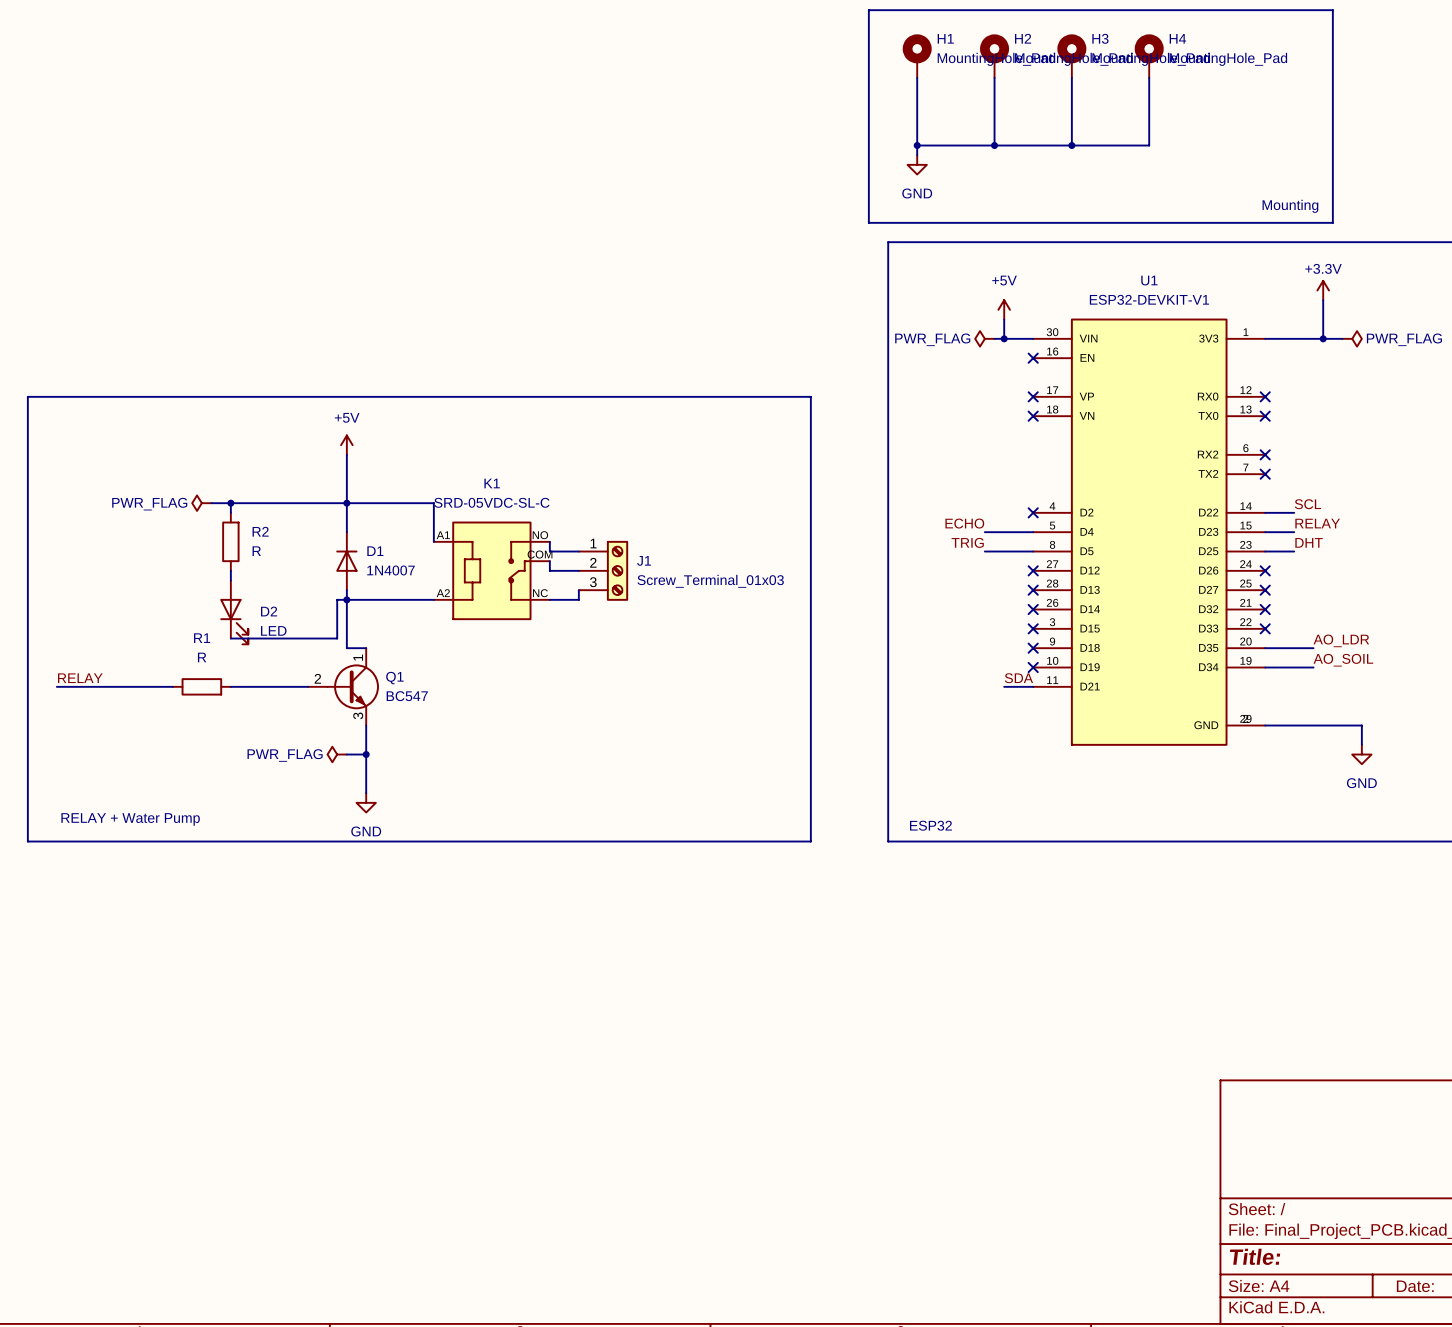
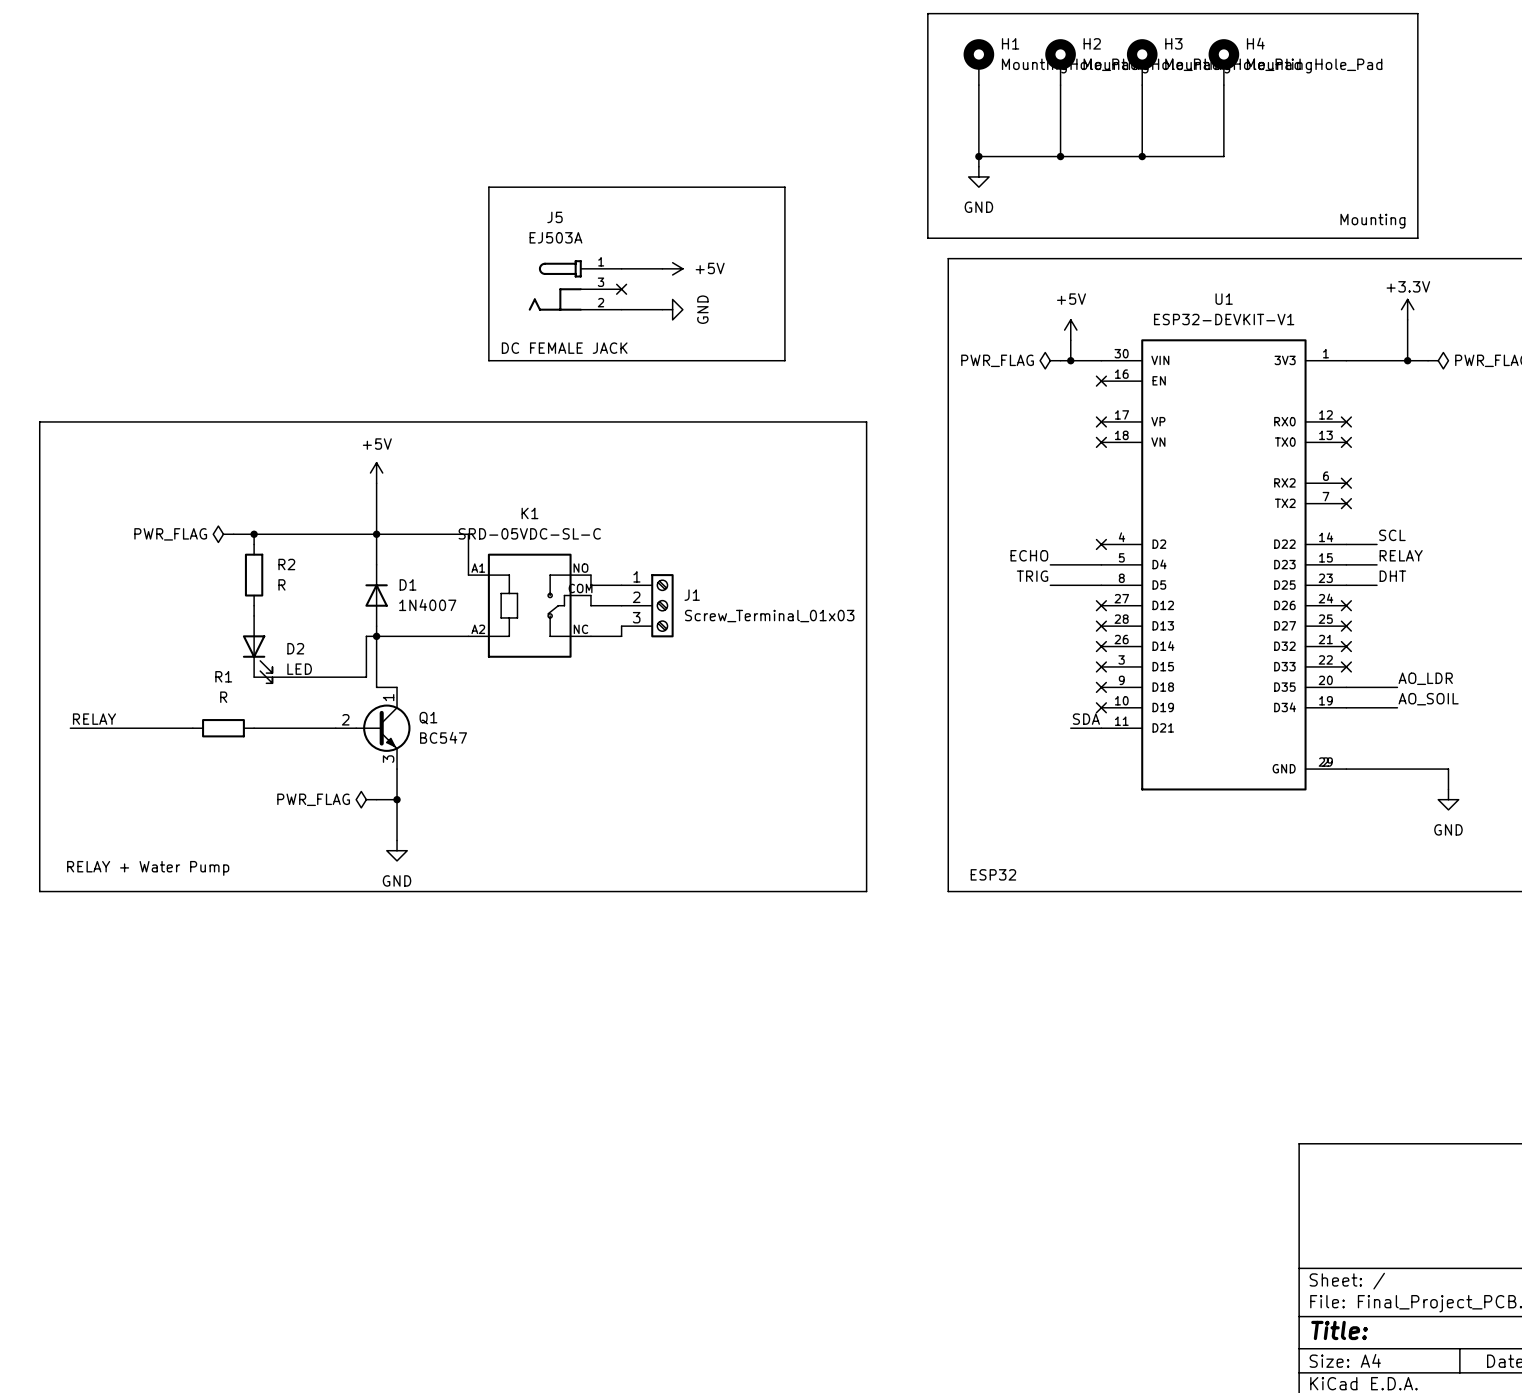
line: none -> (488, 187) (784, 187) (784, 360) (488, 360) (488, 187)
wire: none -> (621, 268) (662, 268)
power symbol: none -> +5V (672, 268)
J5: none -> EJ503A (575, 285)
no-connect mark: none -> (621, 289)
wire: none -> (621, 309) (662, 309)
power symbol: none -> GND (672, 309)
text: none -> DC FEMALE JACK (564, 348)

